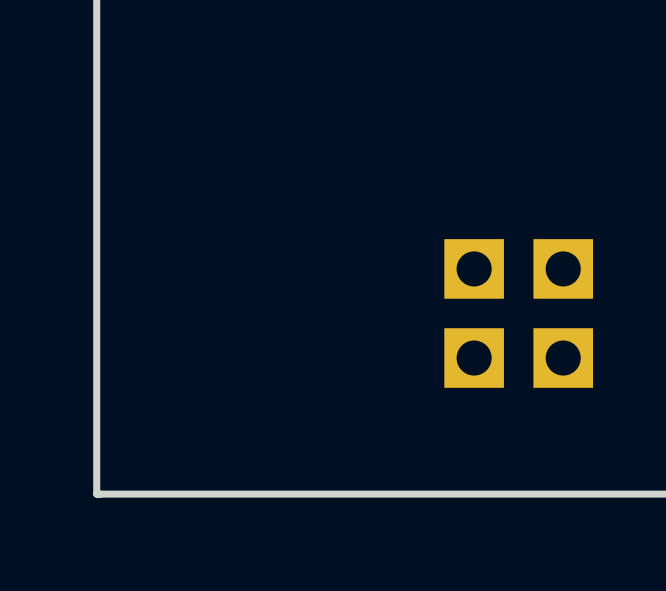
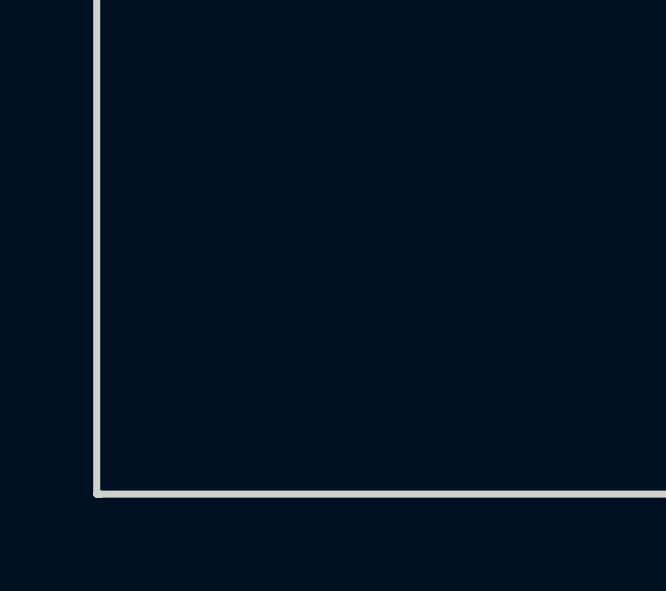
part: (474, 268) -> none
part: (563, 268) -> none
part: (474, 358) -> none
part: (563, 358) -> none

